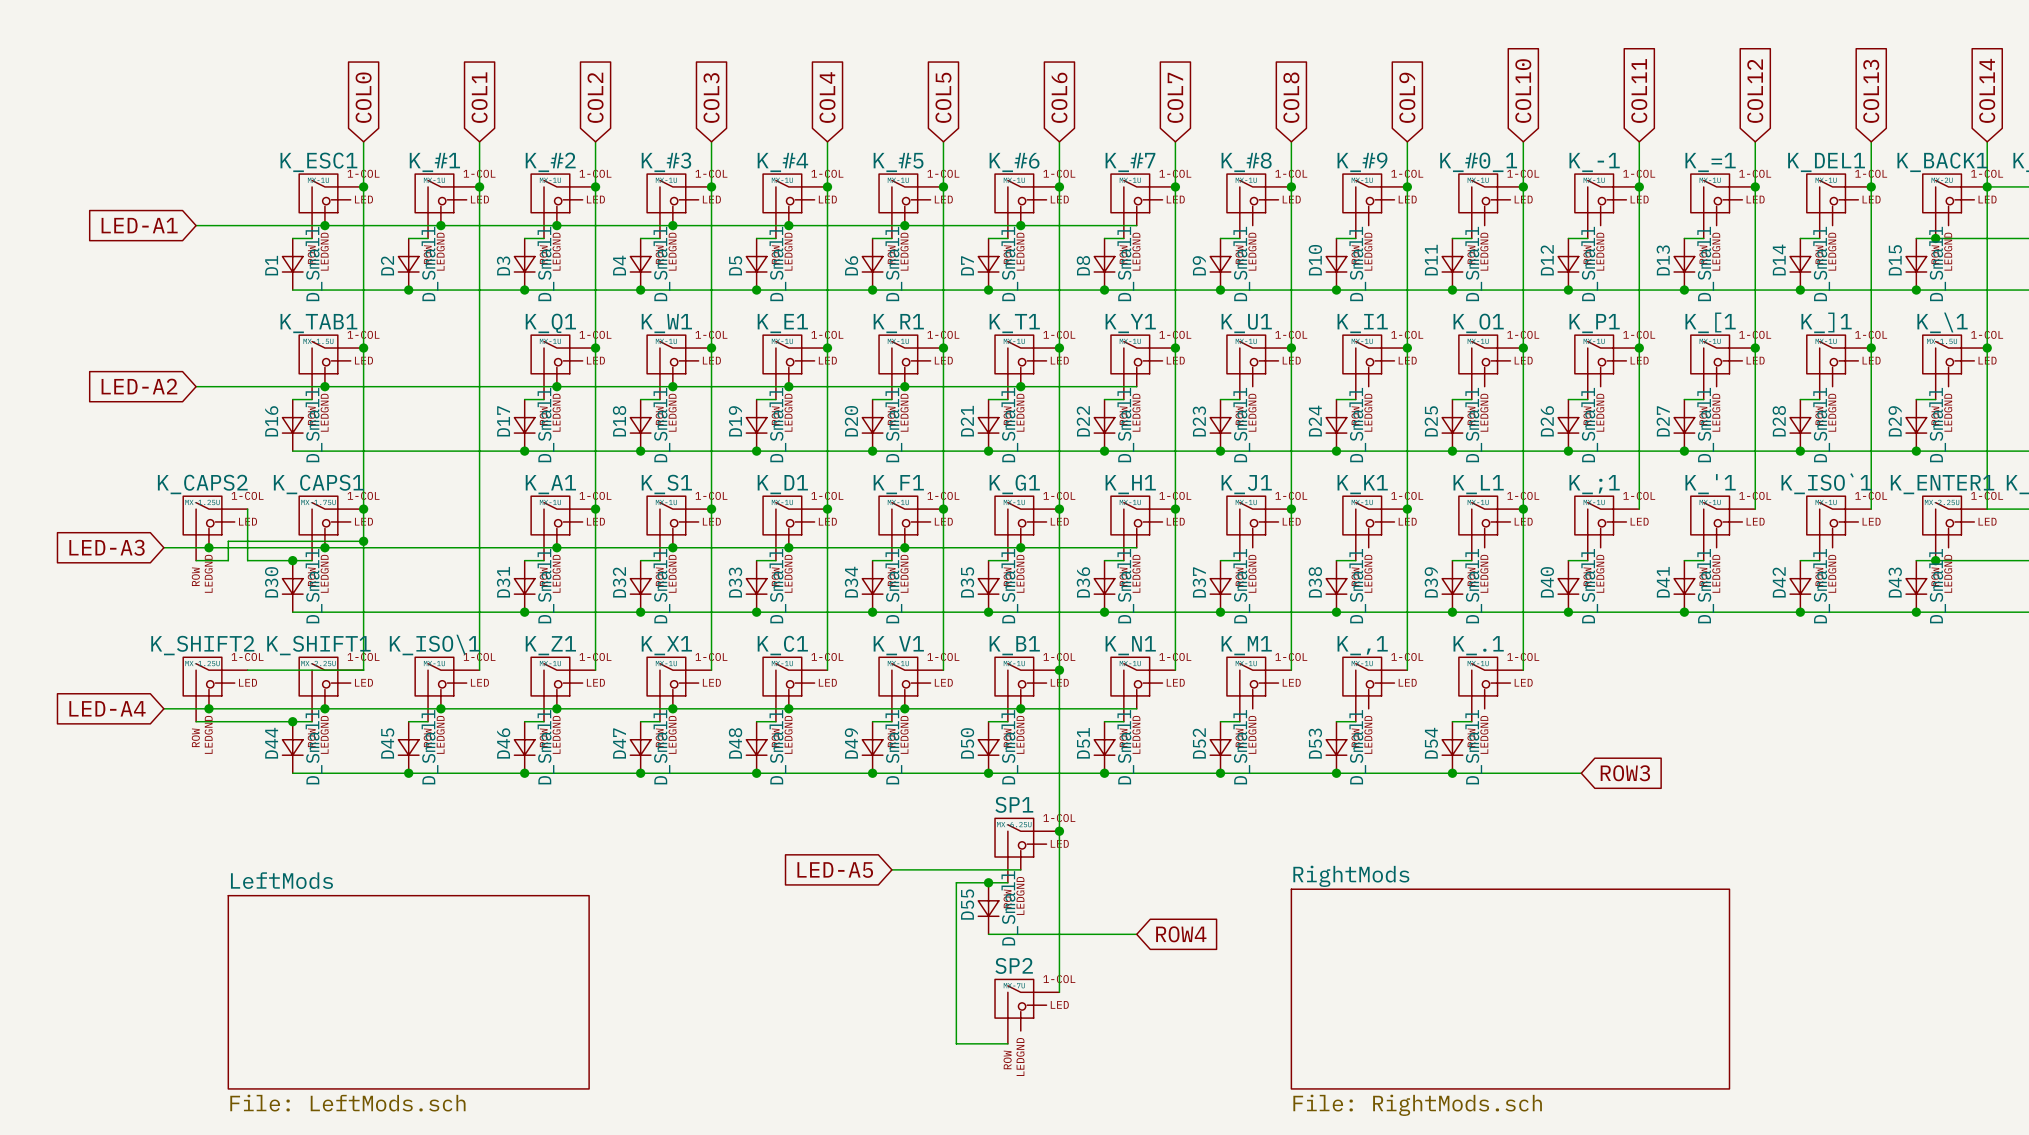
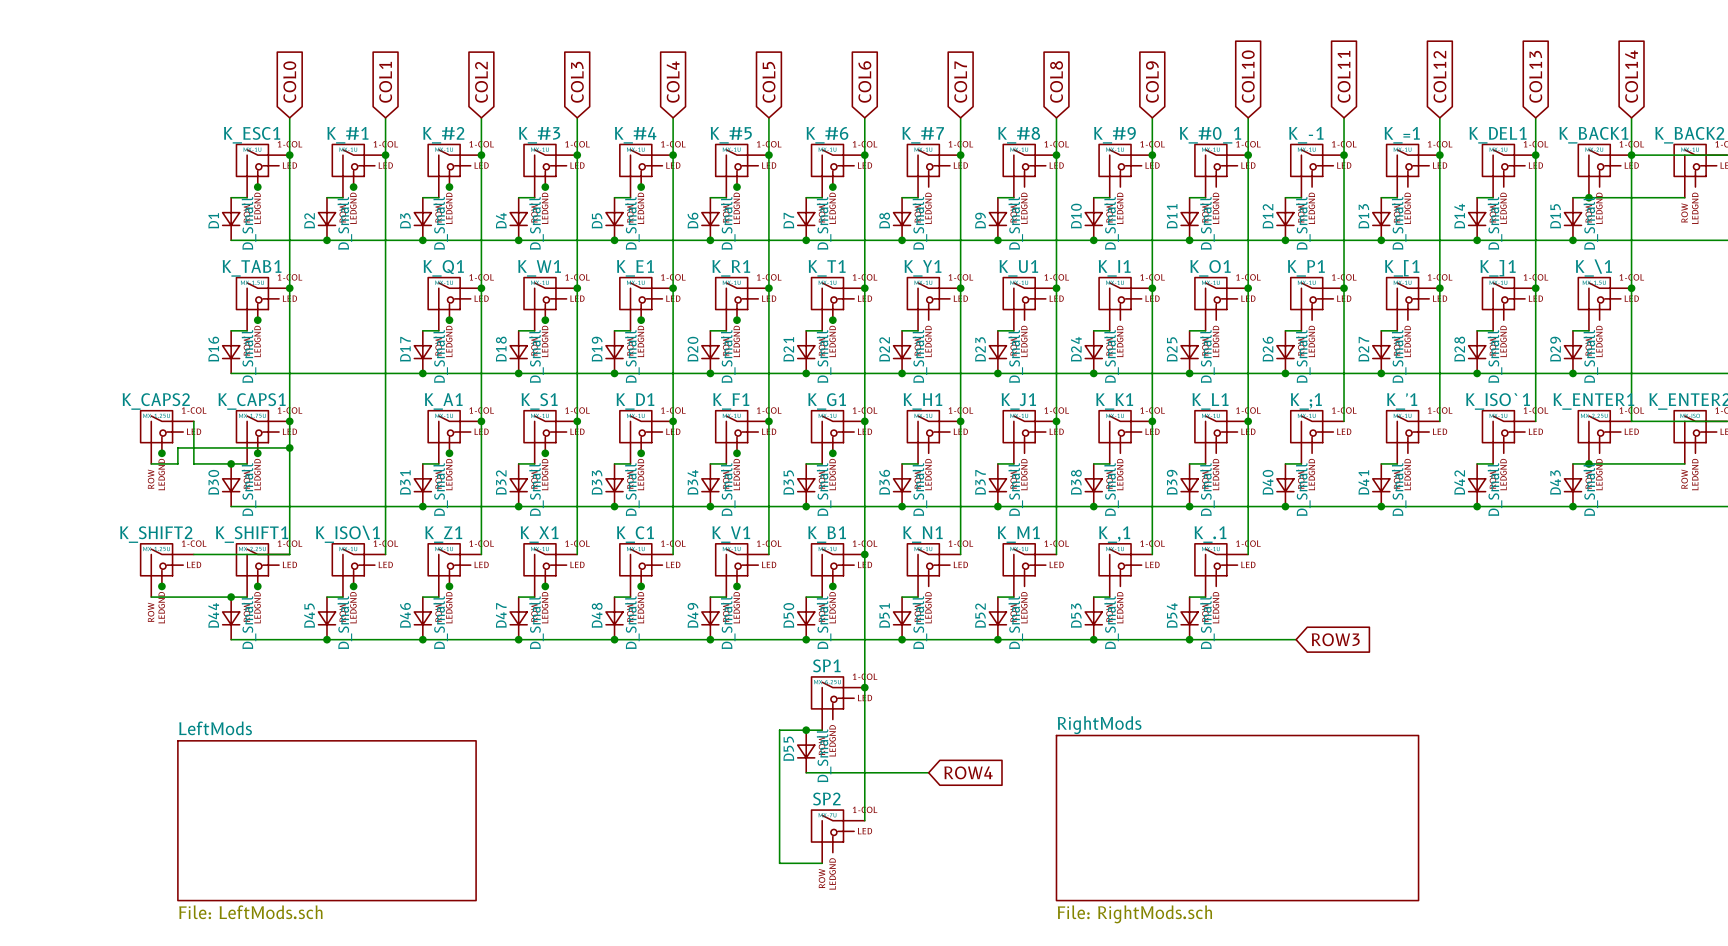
global label: LED-A1 (139, 225) -> none
wire: (196, 225) (1136, 225) -> none
global label: LED-A2 (139, 386) -> none
wire: (196, 386) (1136, 386) -> none
global label: LED-A3 (107, 547) -> none
wire: (163, 547) (1136, 547) -> none
global label: LED-A4 (107, 708) -> none
wire: (163, 708) (1136, 708) -> none
wire: (891, 869) (1020, 869) -> none
global label: LED-A5 (835, 870) -> none

